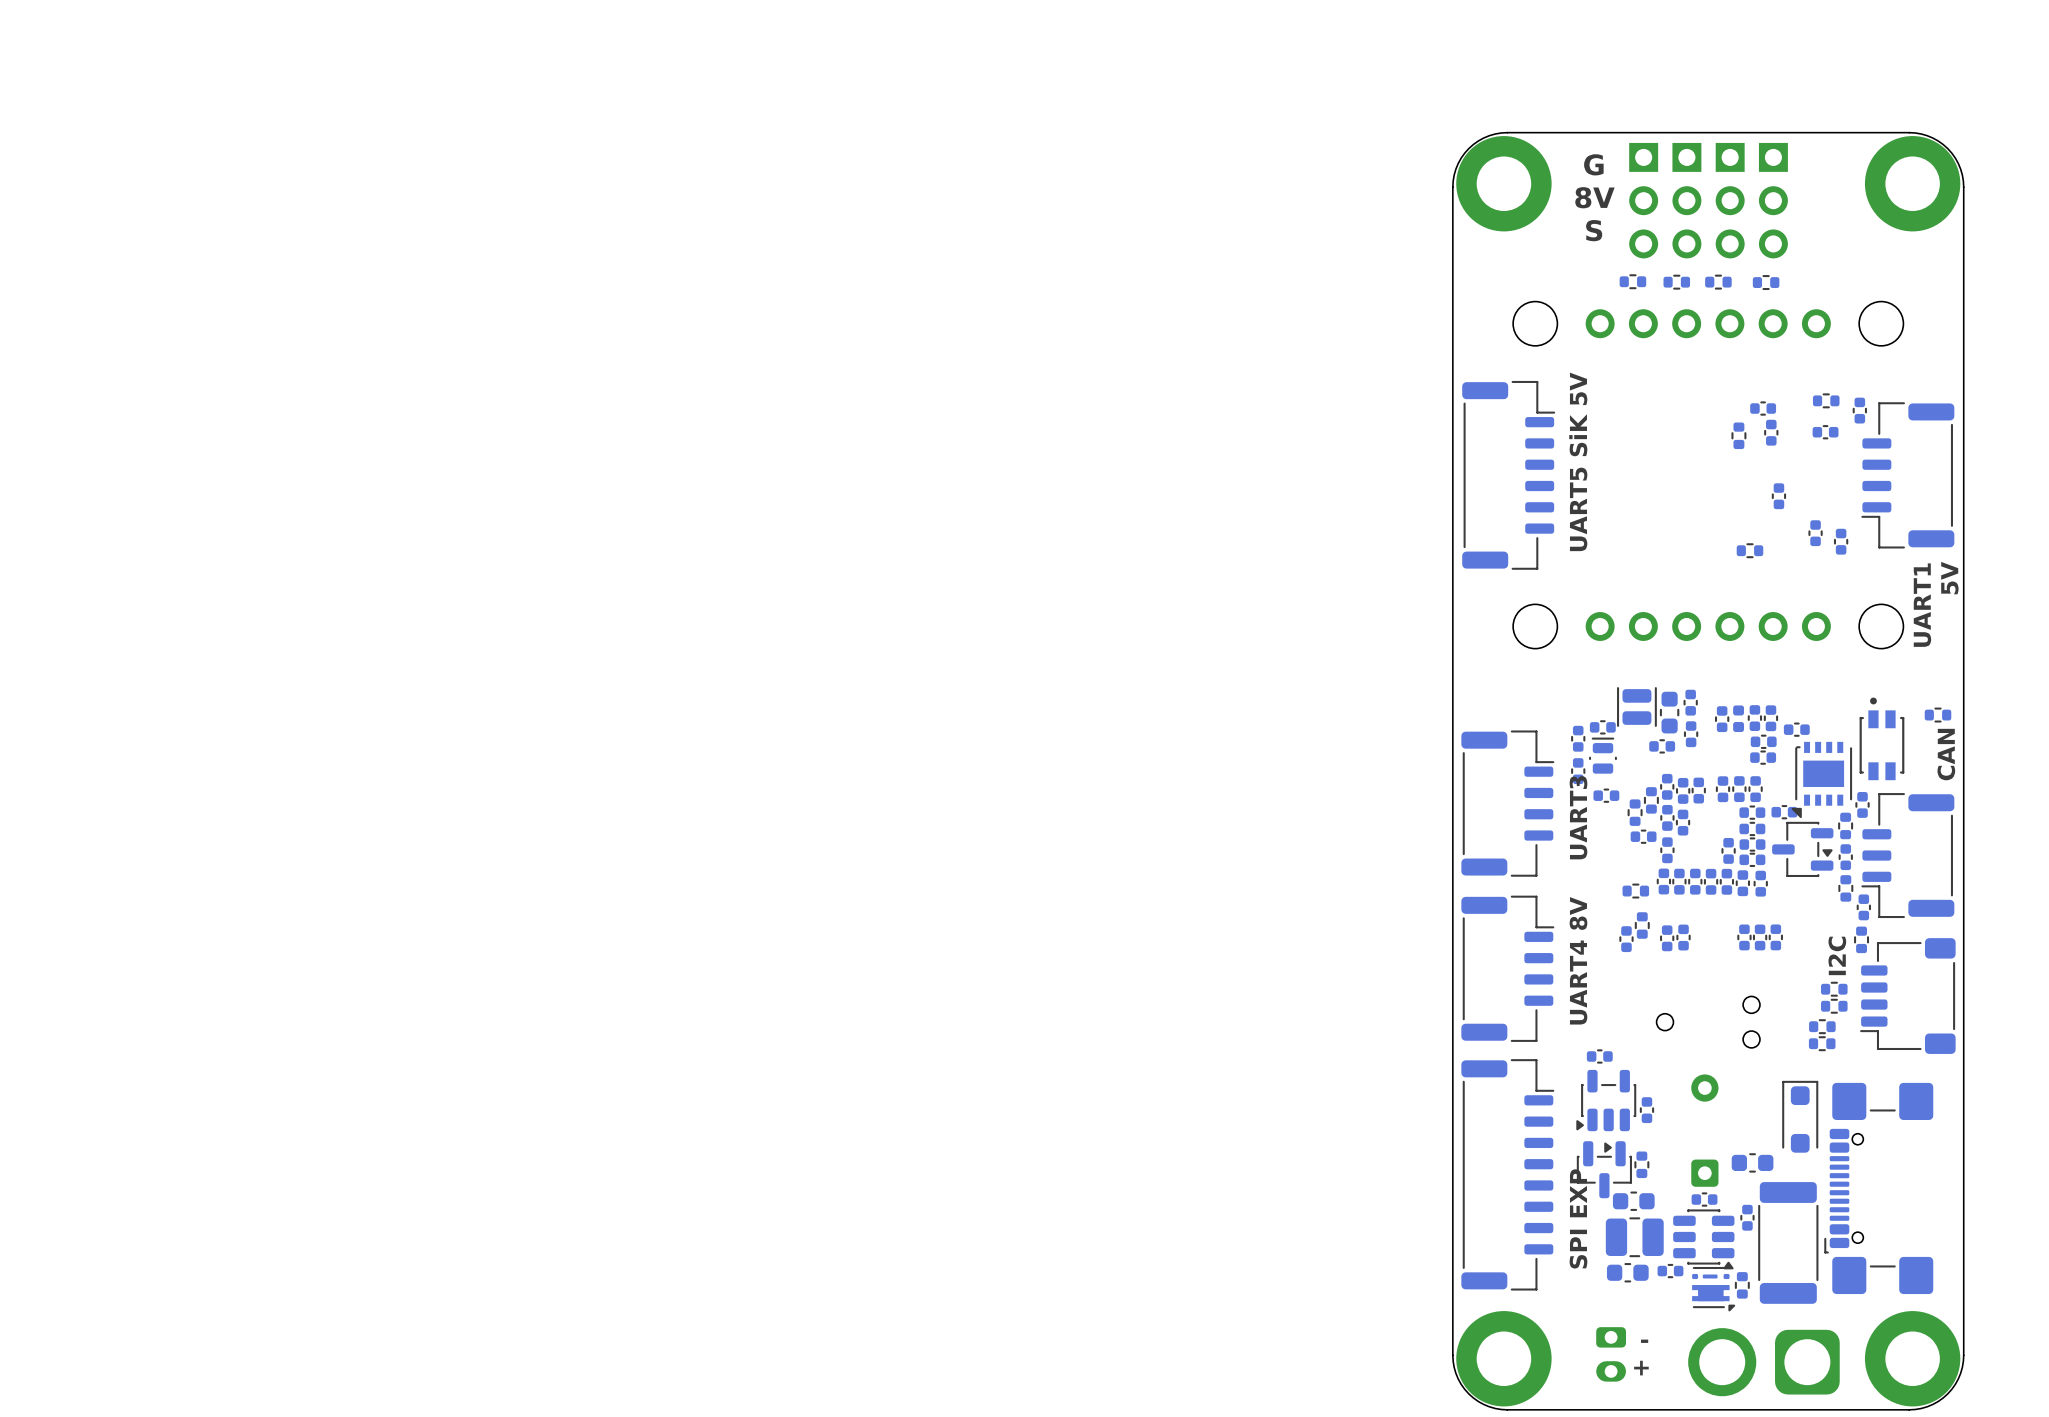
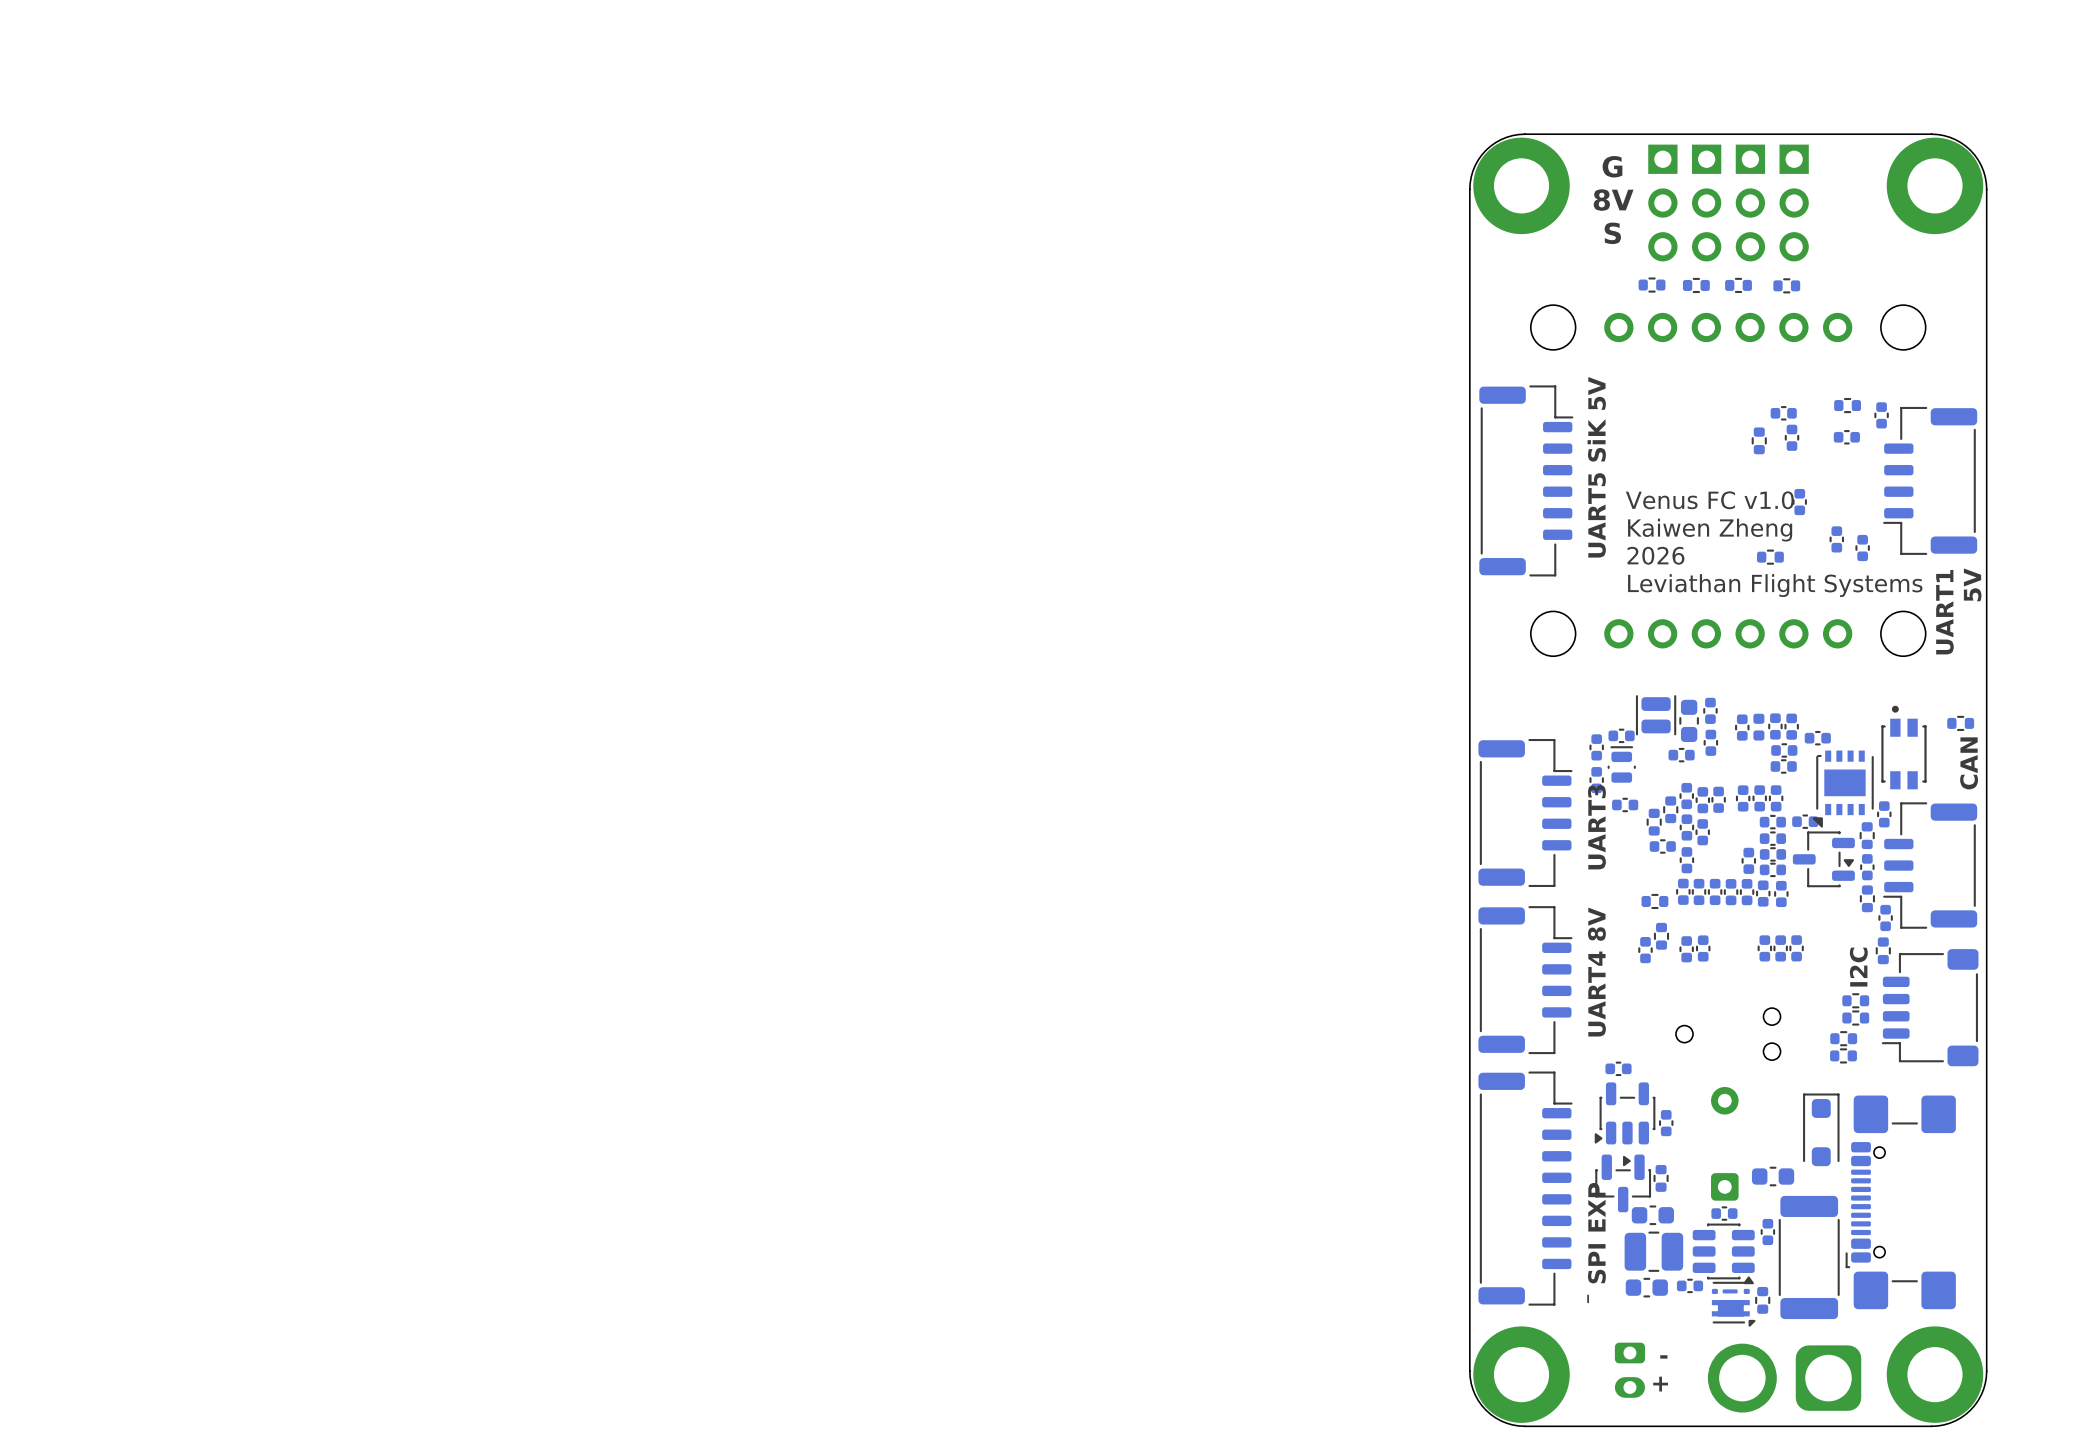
text: none -> Venus FC v1.0 (1709, 500)
text: none -> Kaiwen Zheng (1710, 530)
text: none -> 2026 (1655, 555)
text: none -> Leviathan Flight Systems (1775, 585)
line: none -> (1588, 1295) (1588, 1302)

